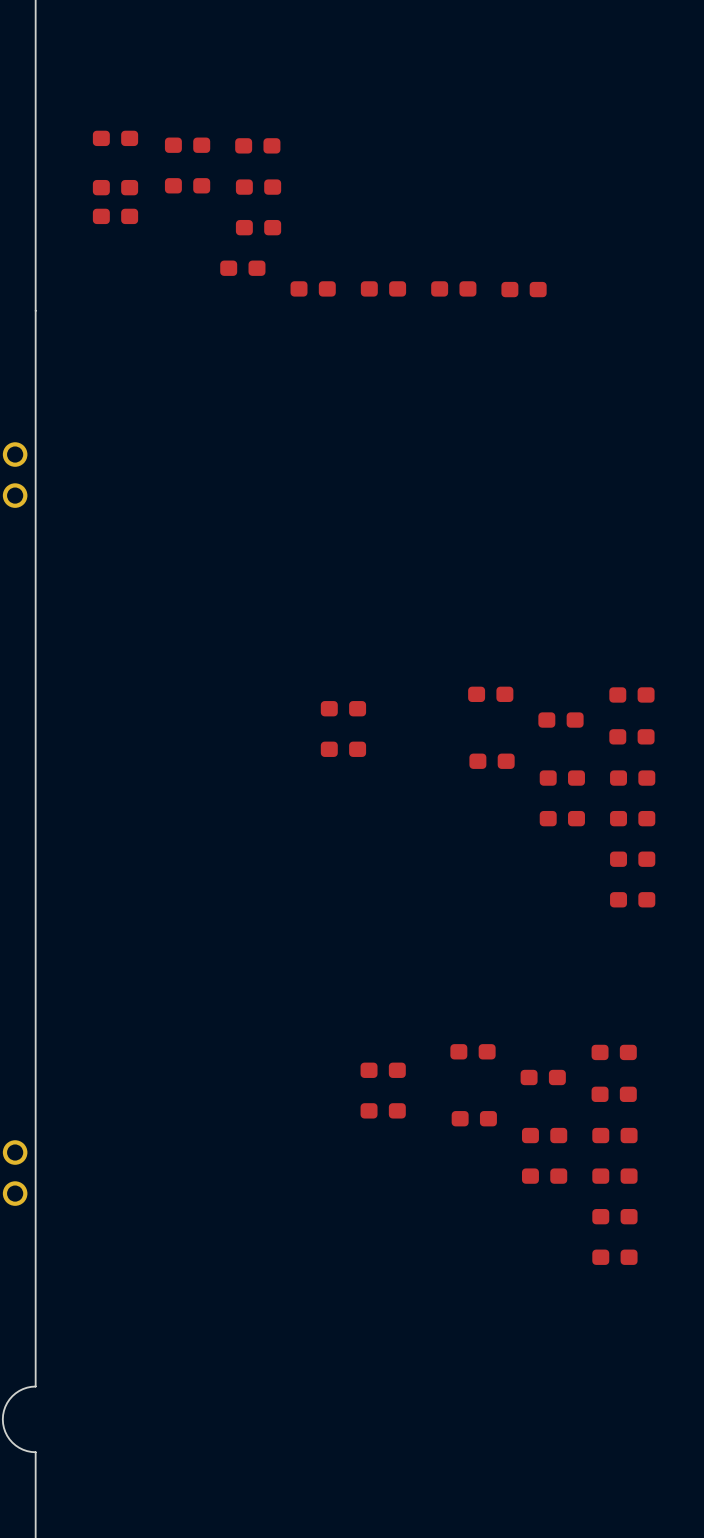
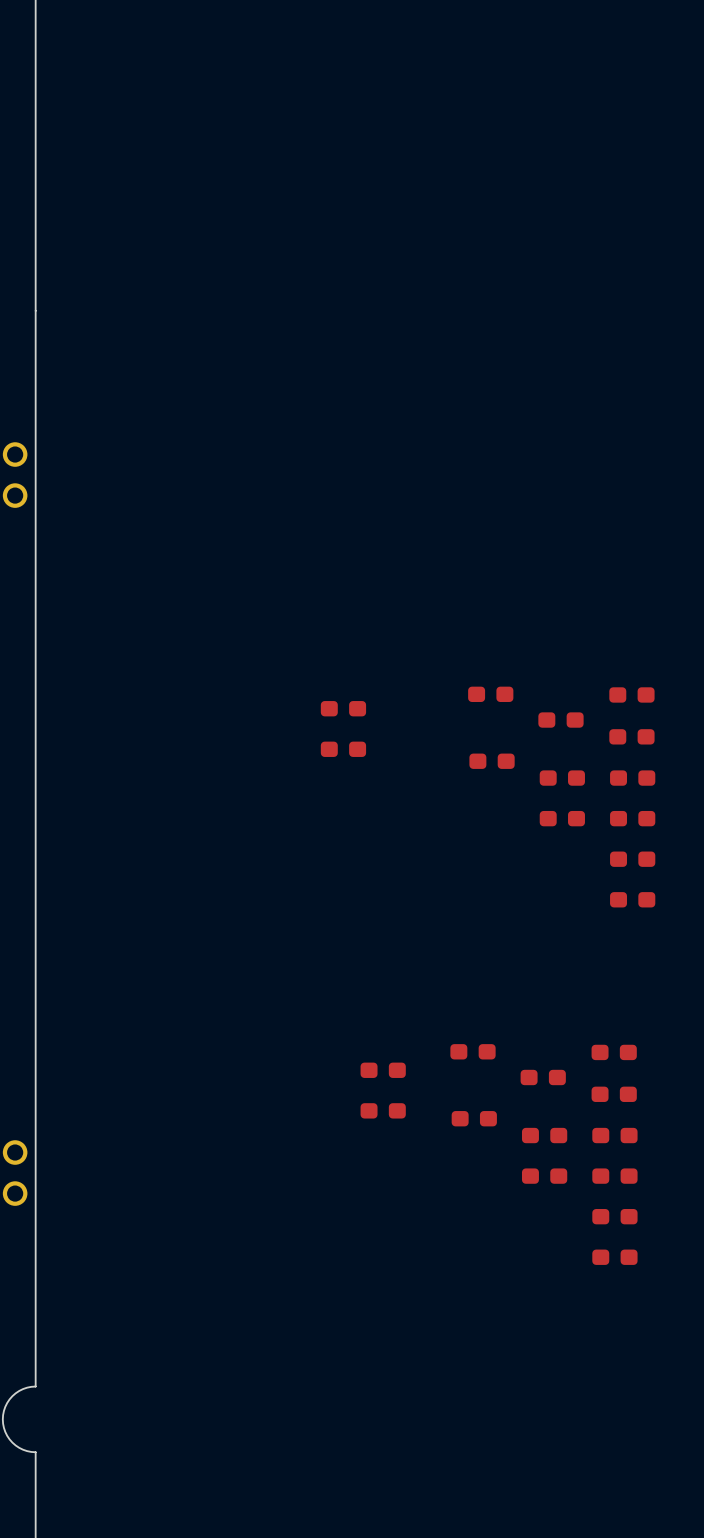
part: (115, 138) -> none
part: (187, 145) -> none
part: (257, 145) -> none
part: (187, 185) -> none
part: (115, 187) -> none
part: (258, 187) -> none
part: (115, 216) -> none
part: (258, 227) -> none
part: (242, 268) -> none
part: (313, 288) -> none
part: (383, 288) -> none
part: (453, 288) -> none
part: (524, 289) -> none

